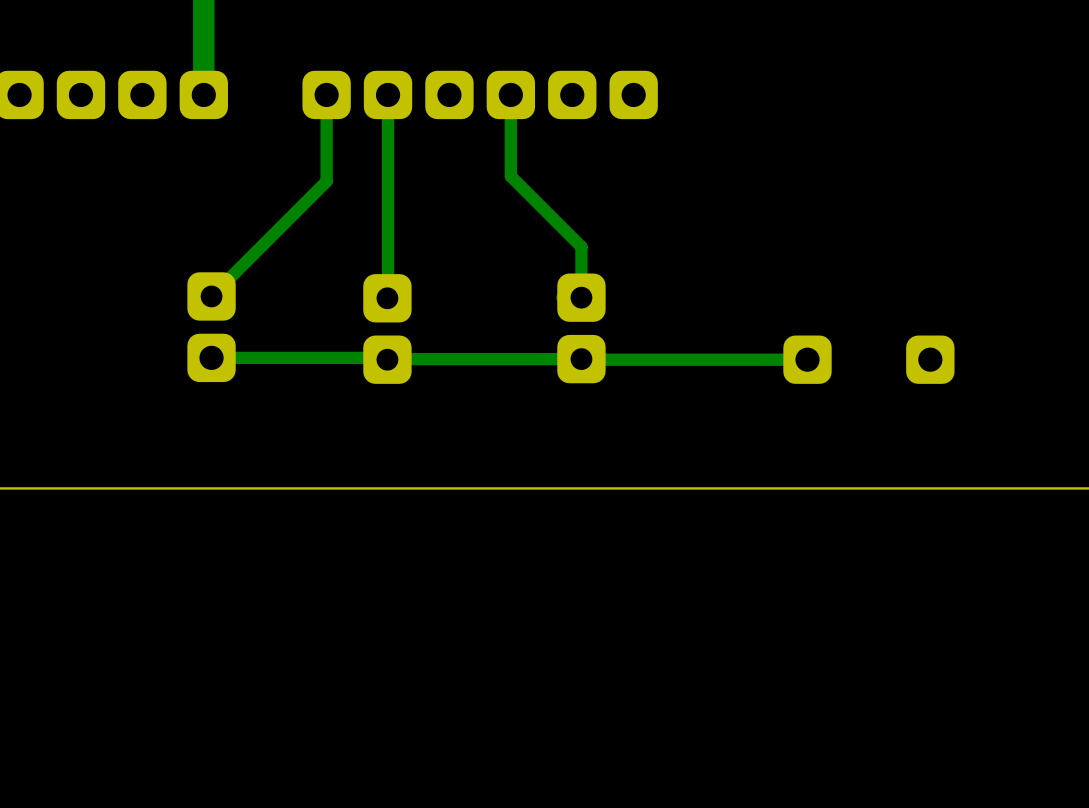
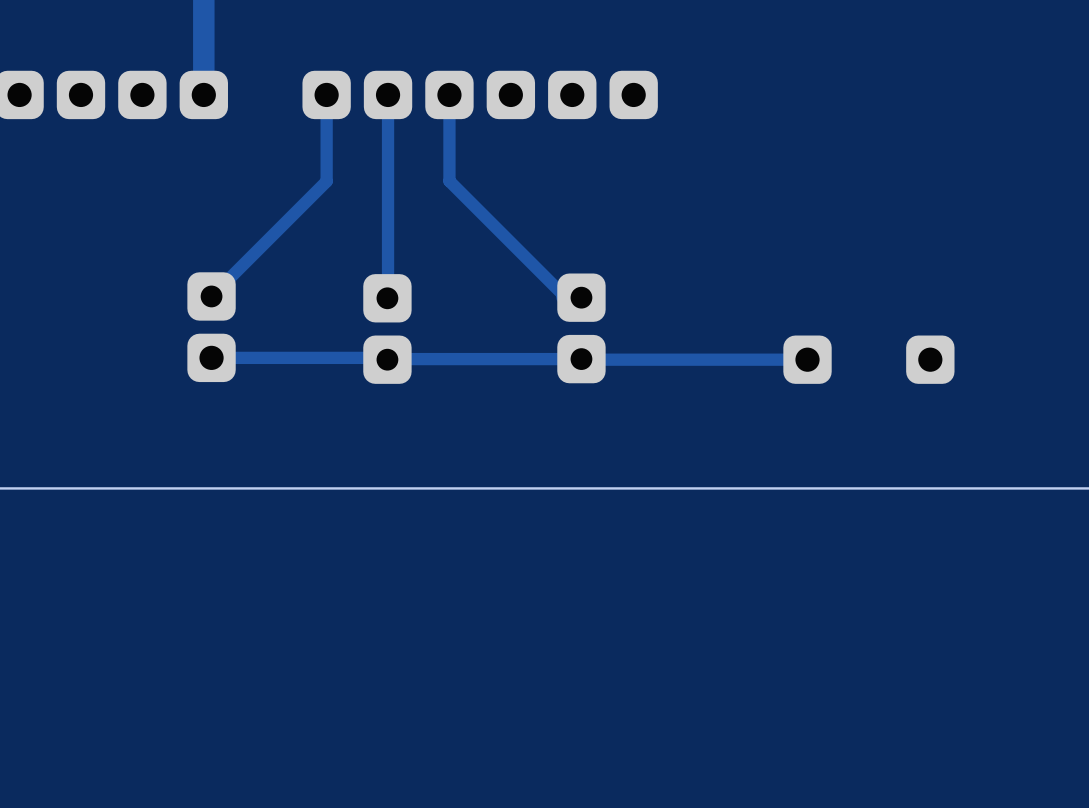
track: none -> (449, 94) (449, 181) (565, 297)
track: (510, 94) (510, 176) (581, 246) (581, 297) -> none

